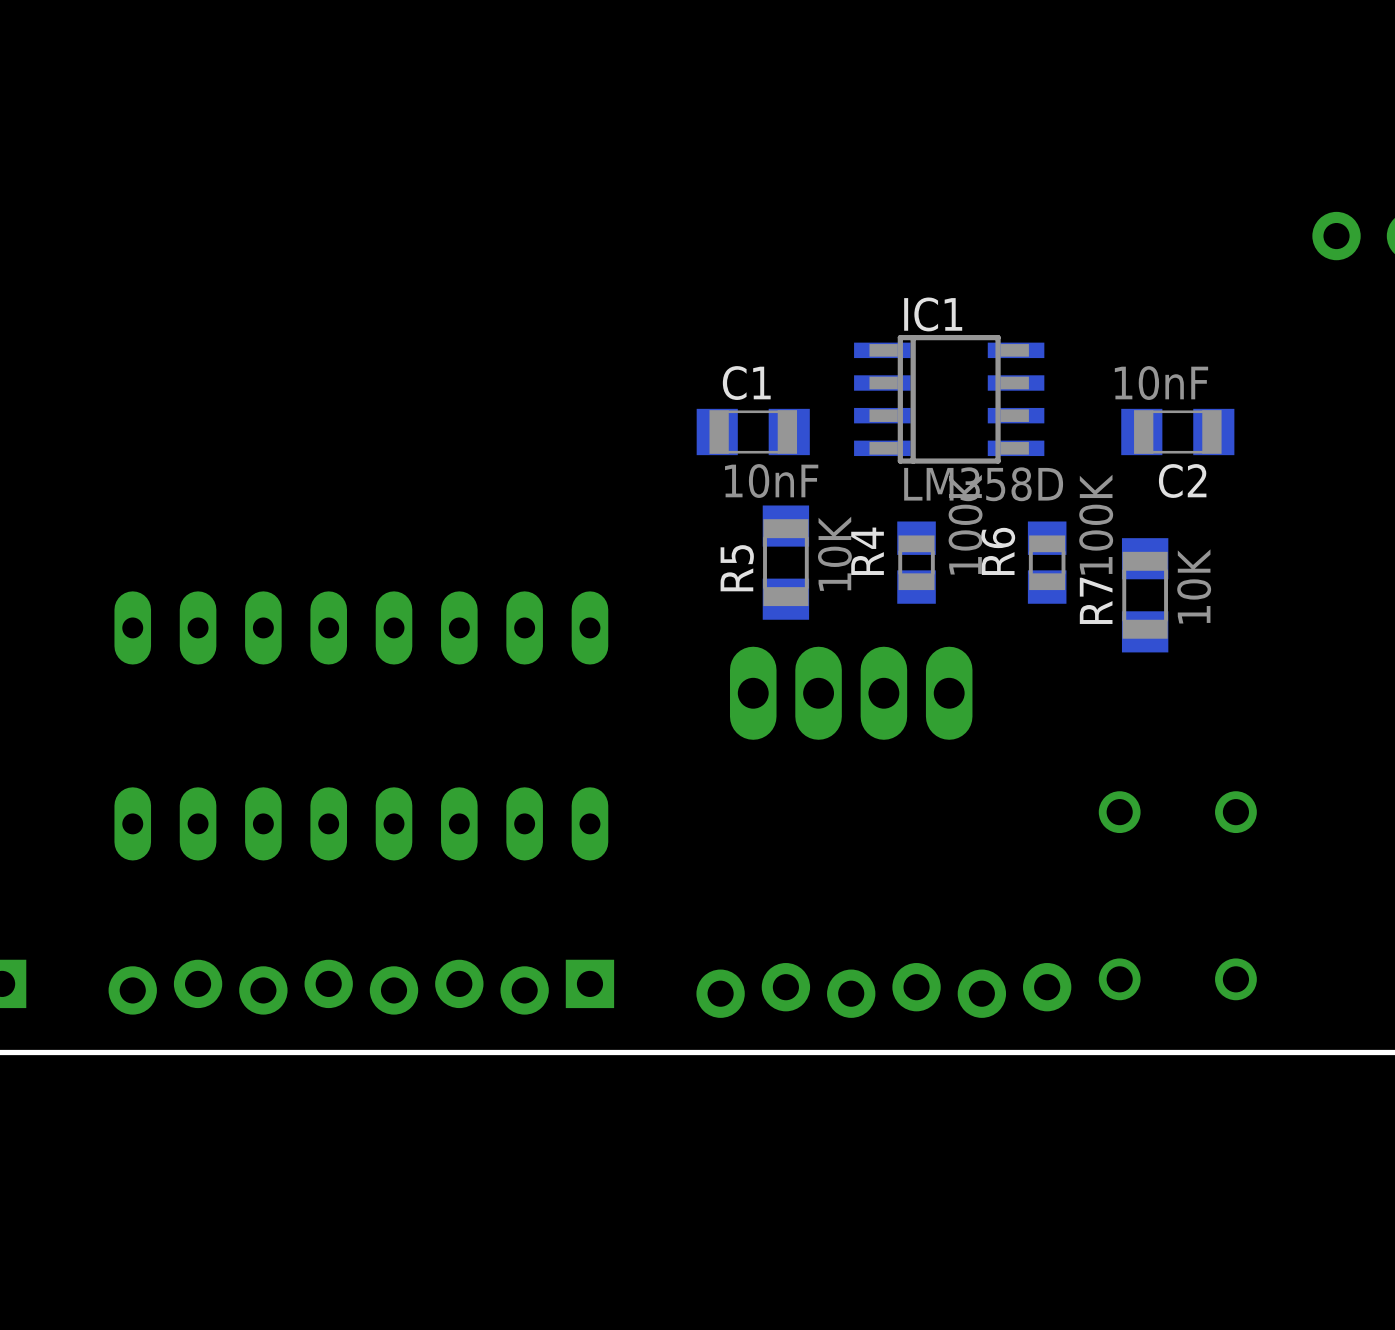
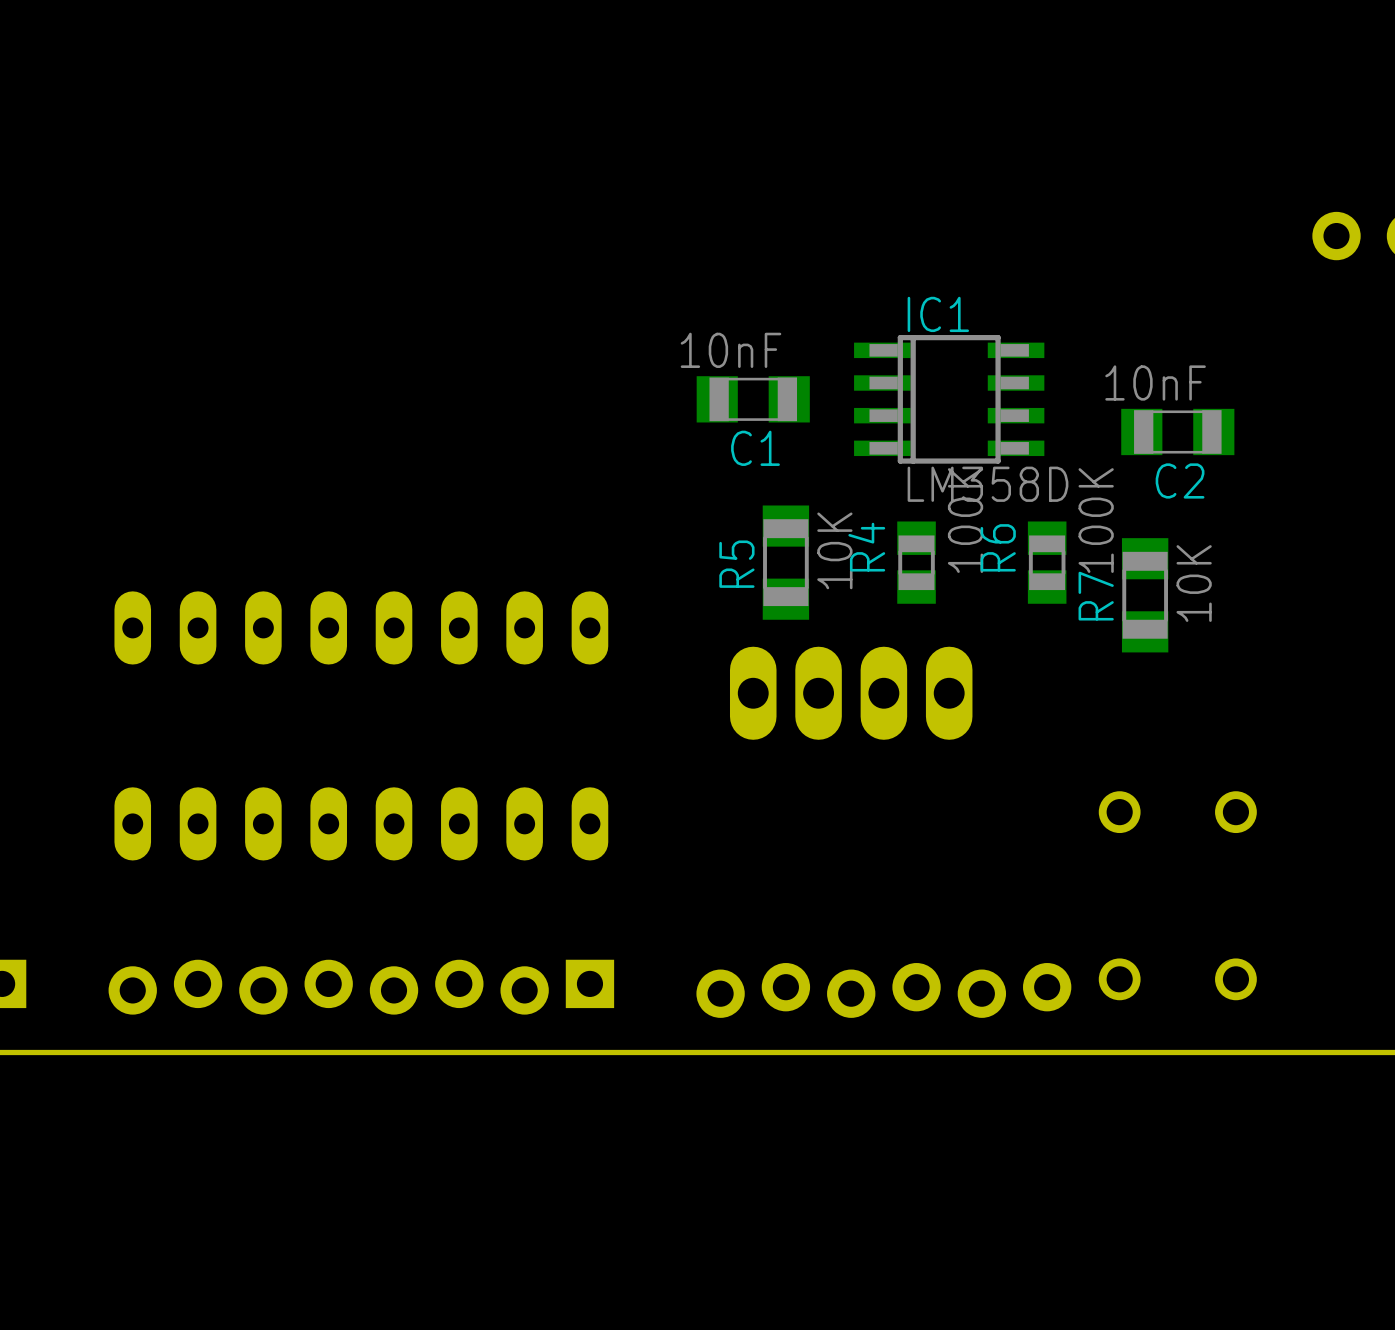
C1 name position: C1 (746, 383) -> C1 (755, 448)
C1 position: (753, 431) -> (753, 399)
C1 value position: 10nF (771, 481) -> 10nF (731, 350)

